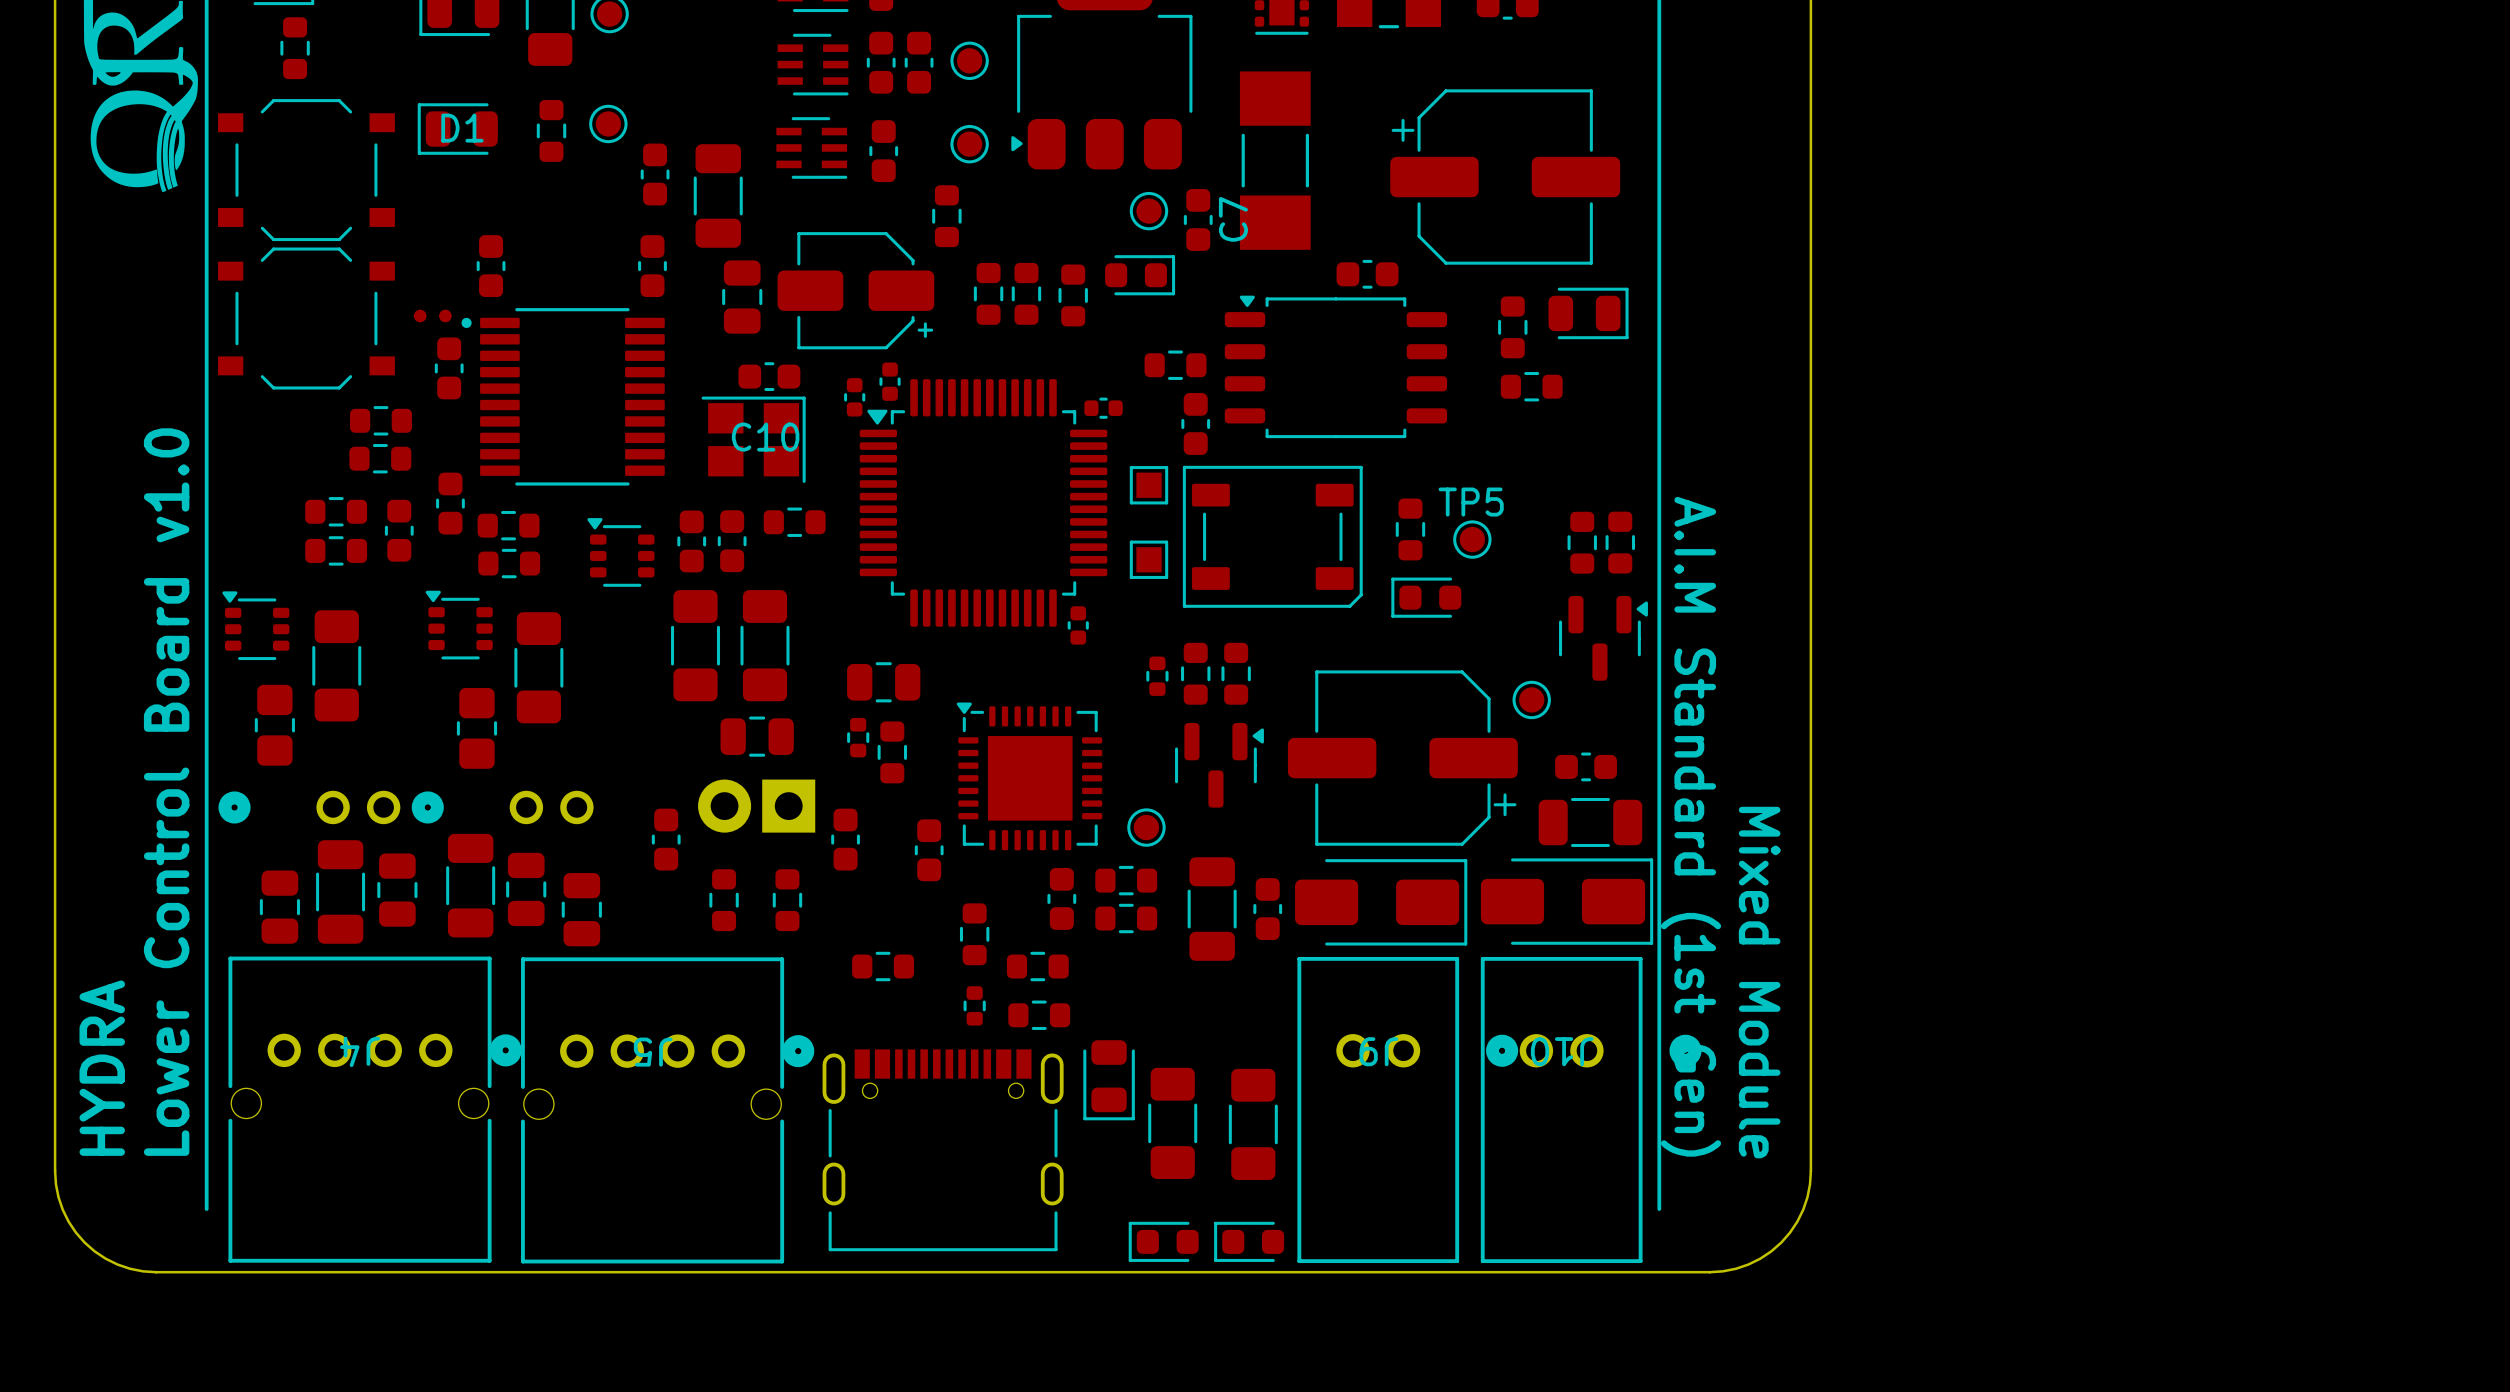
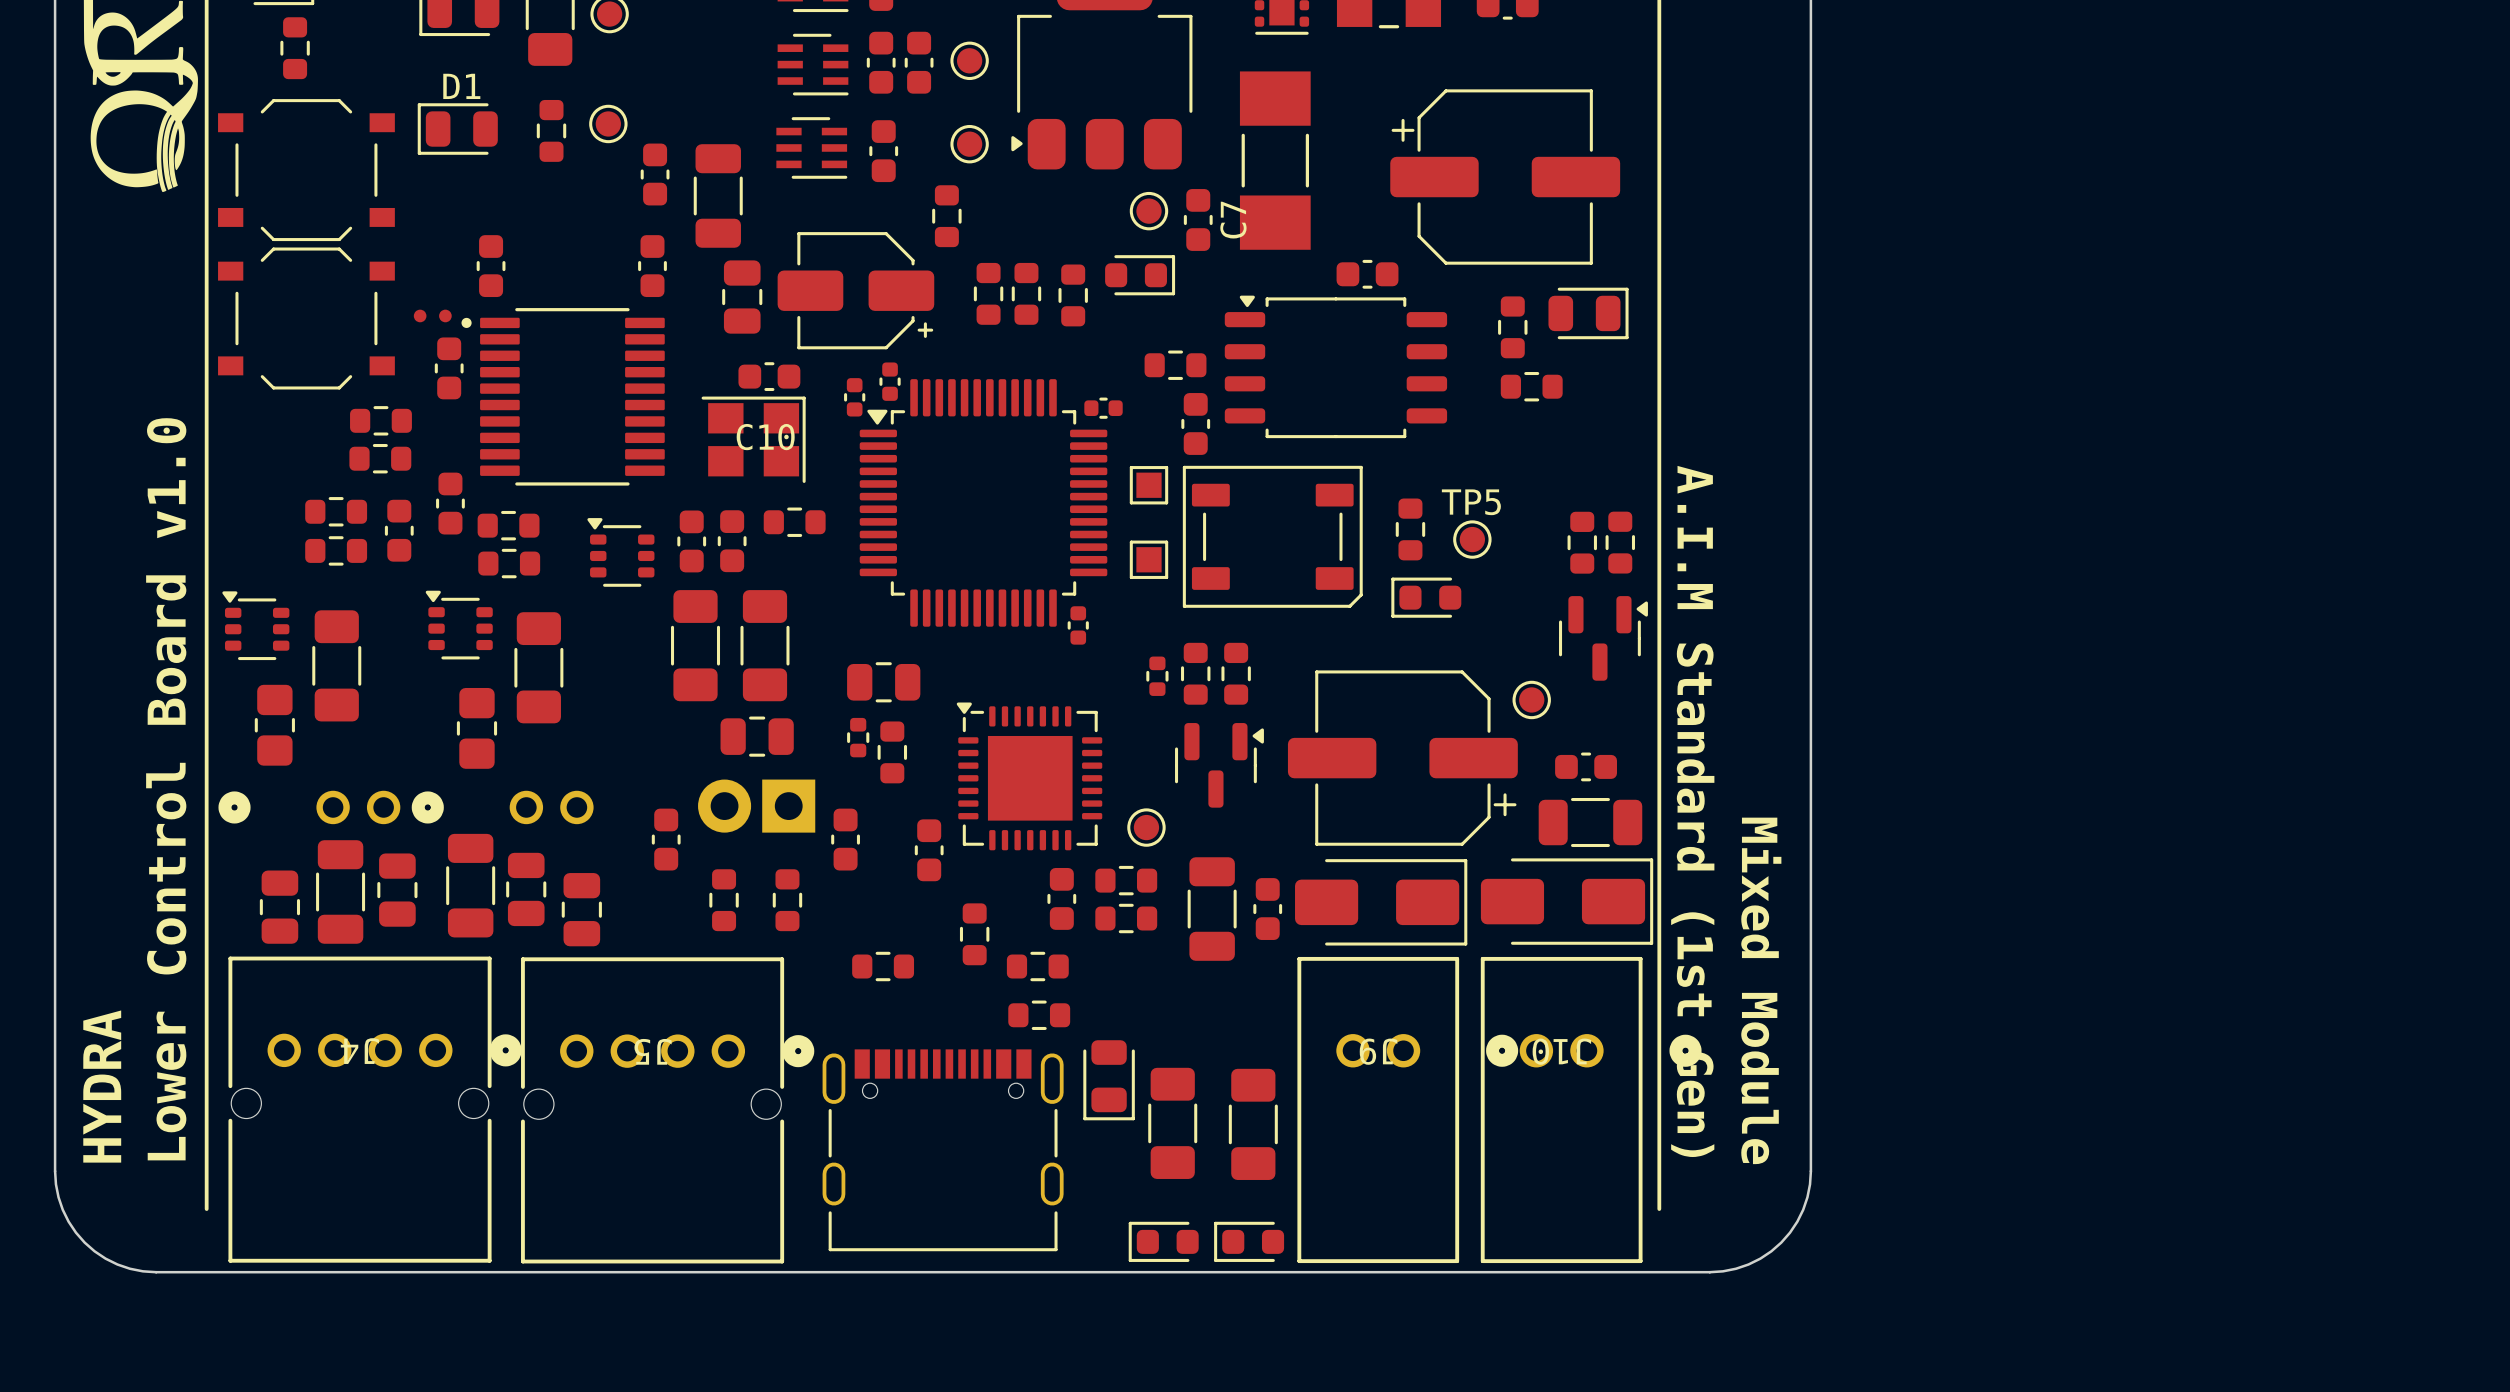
D1 name position: D1 (462, 128) -> D1 (461, 86)
part: (974, 1005) -> none

